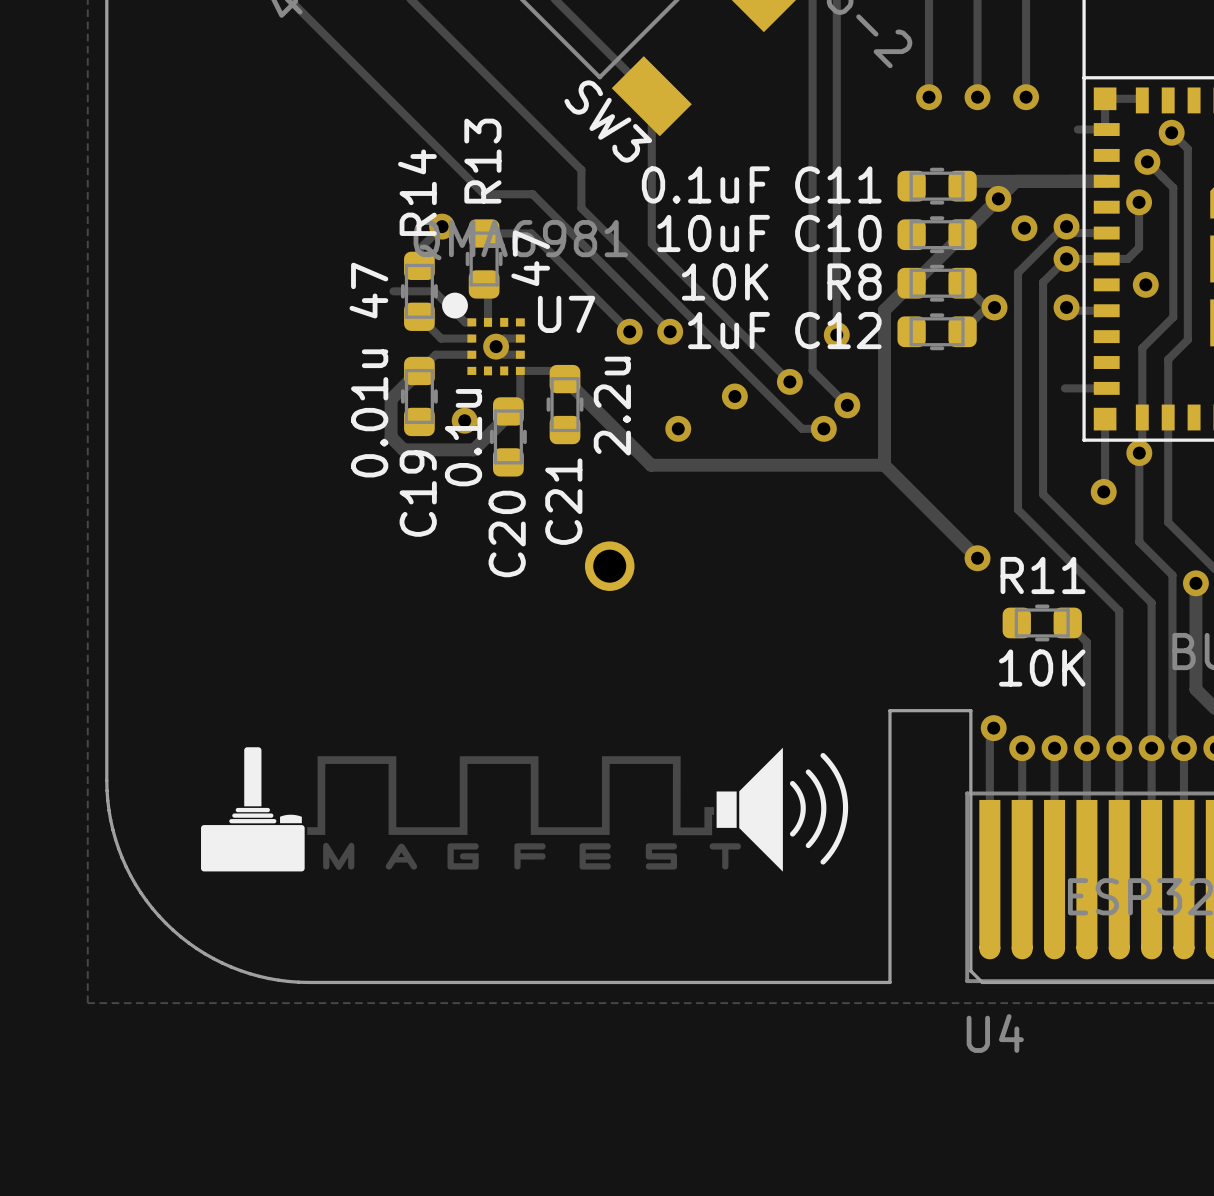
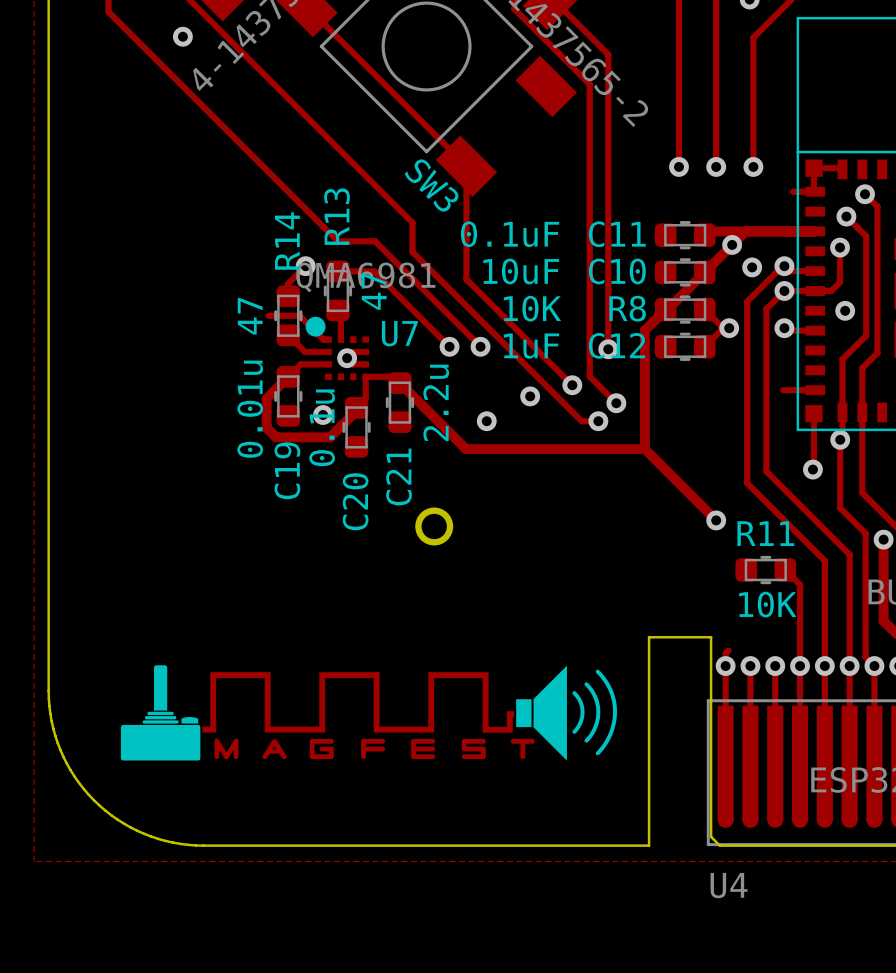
via position: (993, 728) -> (725, 666)

